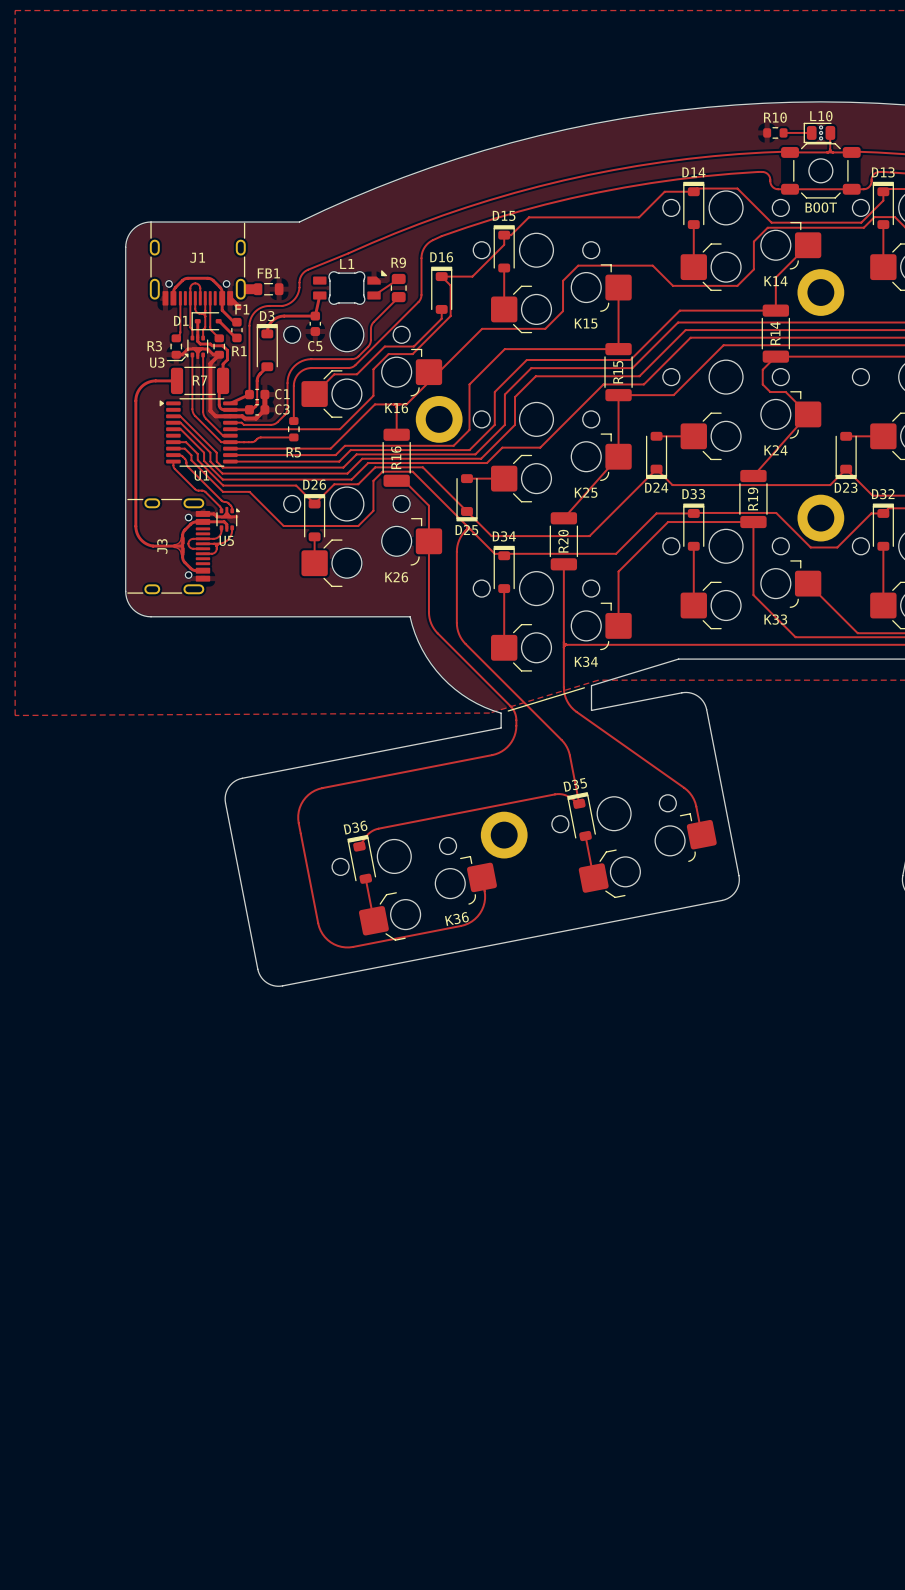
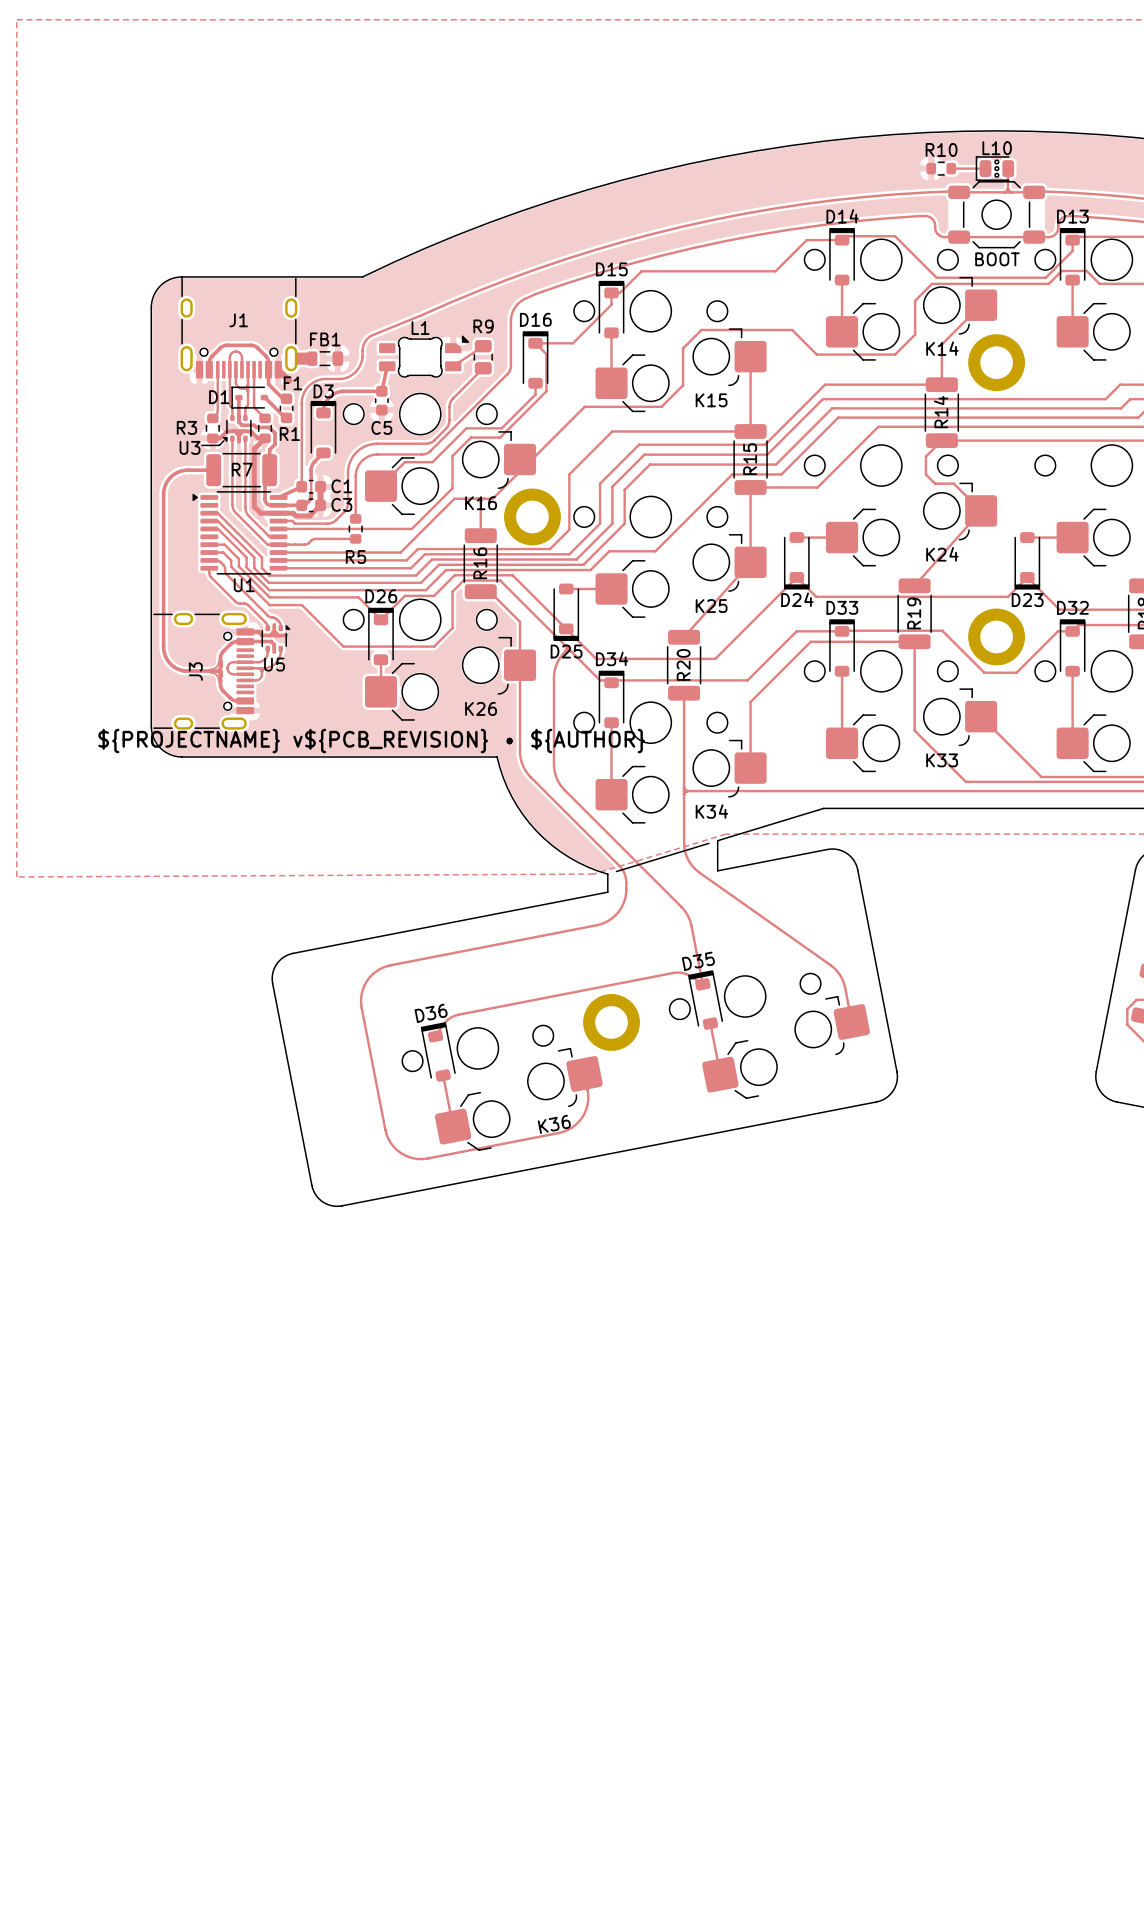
text: none -> ${PROJECTNAME} v${PCB_REVISION} • ${AUTHOR} (371, 741)

